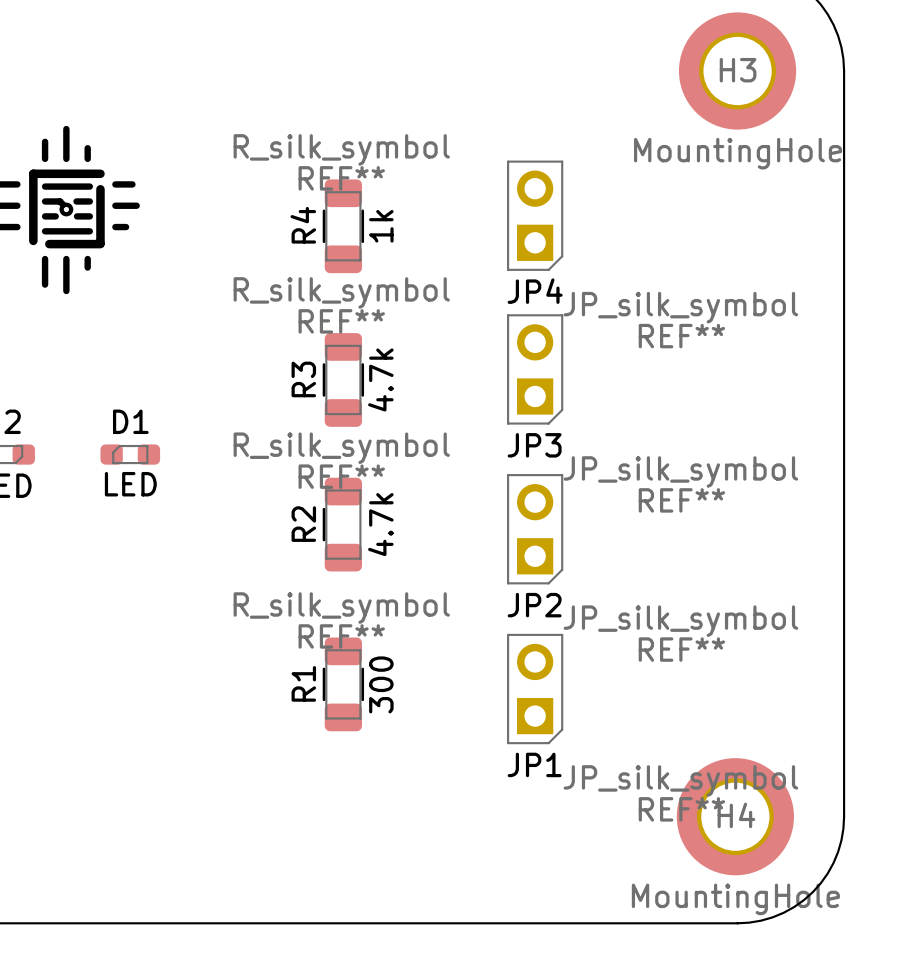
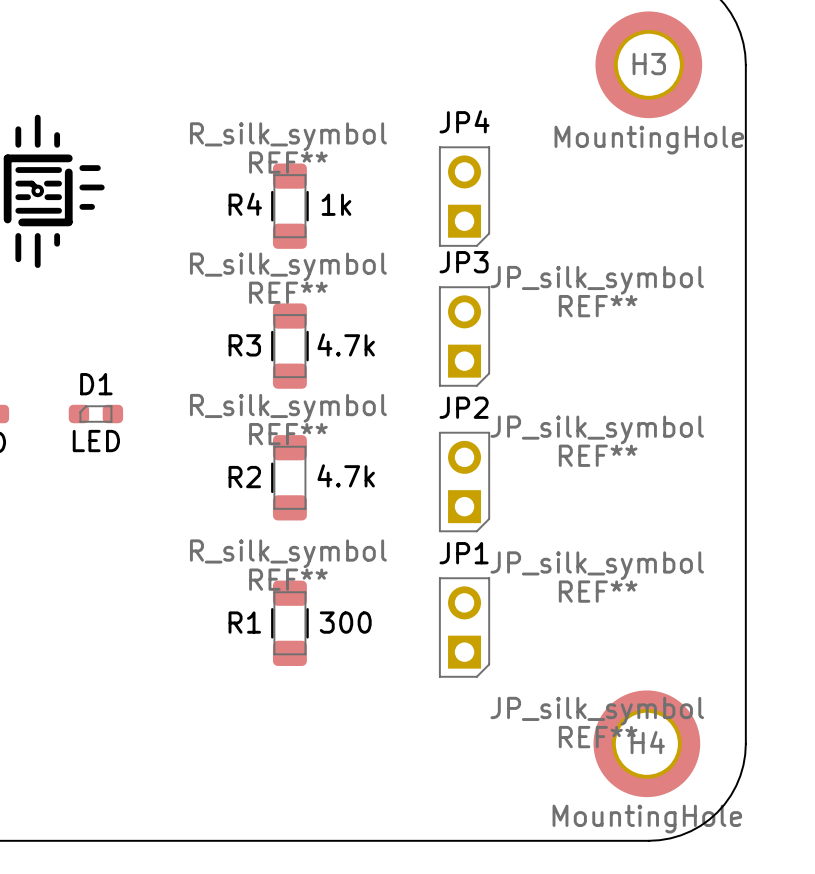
R4 name rotation: 0° (303, 225) -> 90° clockwise (245, 204)
R4 value rotation: 0° (381, 226) -> 90° clockwise (336, 204)
JP4 name position: JP4 (535, 291) -> JP4 (464, 121)
R3 name rotation: 0° (303, 379) -> 90° clockwise (244, 345)
R3 value rotation: 0° (380, 379) -> 90° clockwise (346, 344)
JP3 name position: JP3 (534, 445) -> JP3 (464, 262)
R2 name rotation: 0° (303, 524) -> 90° clockwise (244, 477)
R2 value rotation: 0° (380, 524) -> 90° clockwise (346, 475)
JP2 name position: JP2 (534, 605) -> JP2 (464, 407)
R1 name rotation: 0° (303, 683) -> 90° clockwise (244, 622)
R1 value rotation: 0° (381, 684) -> 90° clockwise (345, 622)
JP1 name position: JP1 (534, 764) -> JP1 (464, 553)

